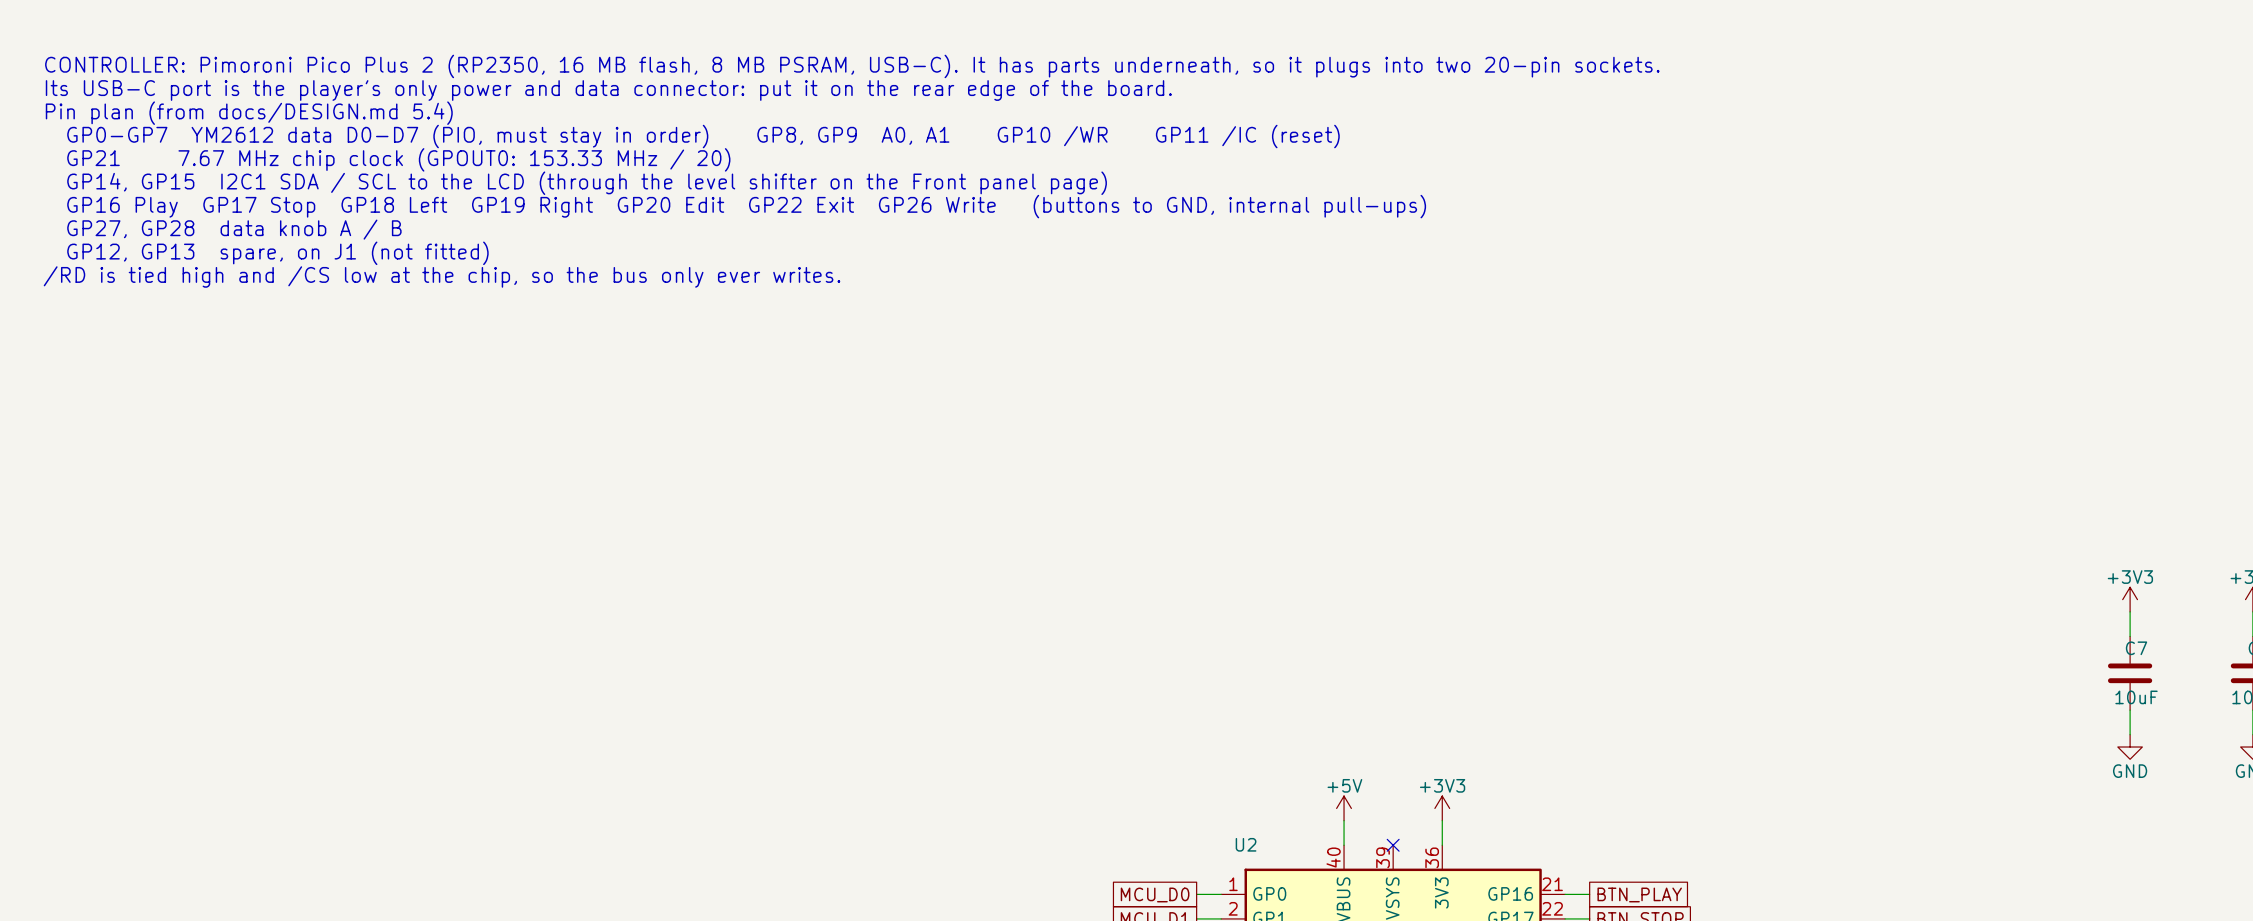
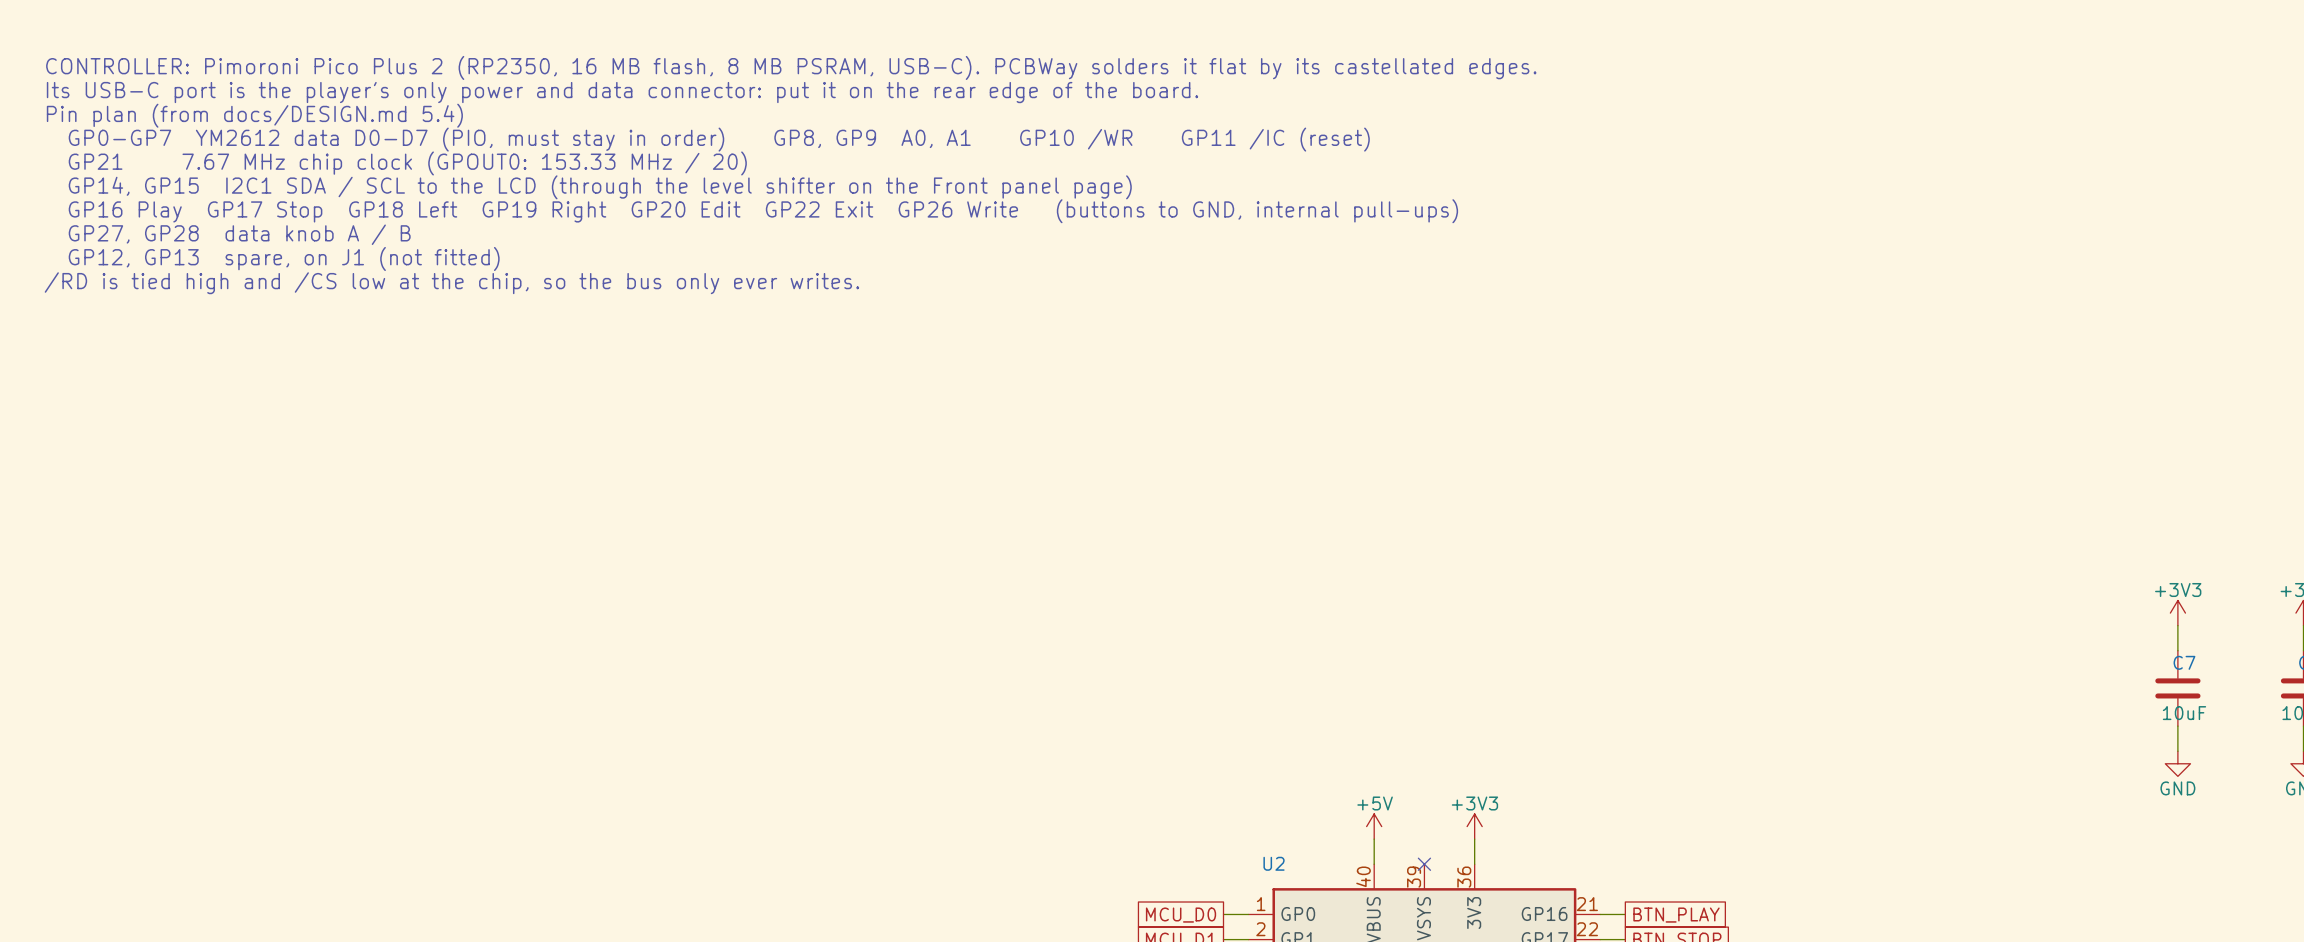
text: CONTROLLER: Pimoroni Pico Plus 2 (RP2350, 16 MB flash, 8 MB PSRAM, USB-C). It has parts underneath, so it plugs into two 20-pin sockets. (852, 66) -> CONTROLLER: Pimoroni Pico Plus 2 (RP2350, 16 MB flash, 8 MB PSRAM, USB-C). PCBWay solders it flat by its castellated edges. (791, 67)

